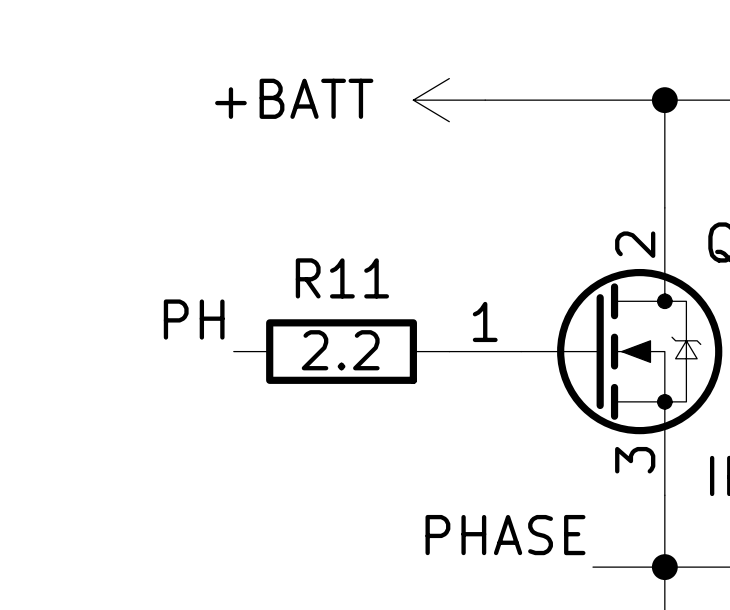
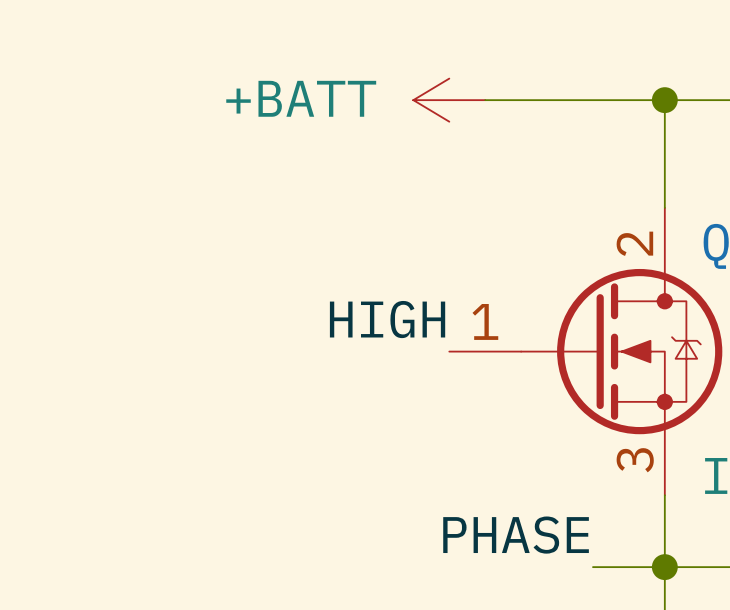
label: PH (194, 319) -> none
label: none -> HIGH (387, 319)
R11: 2.2 (341, 351) -> none

